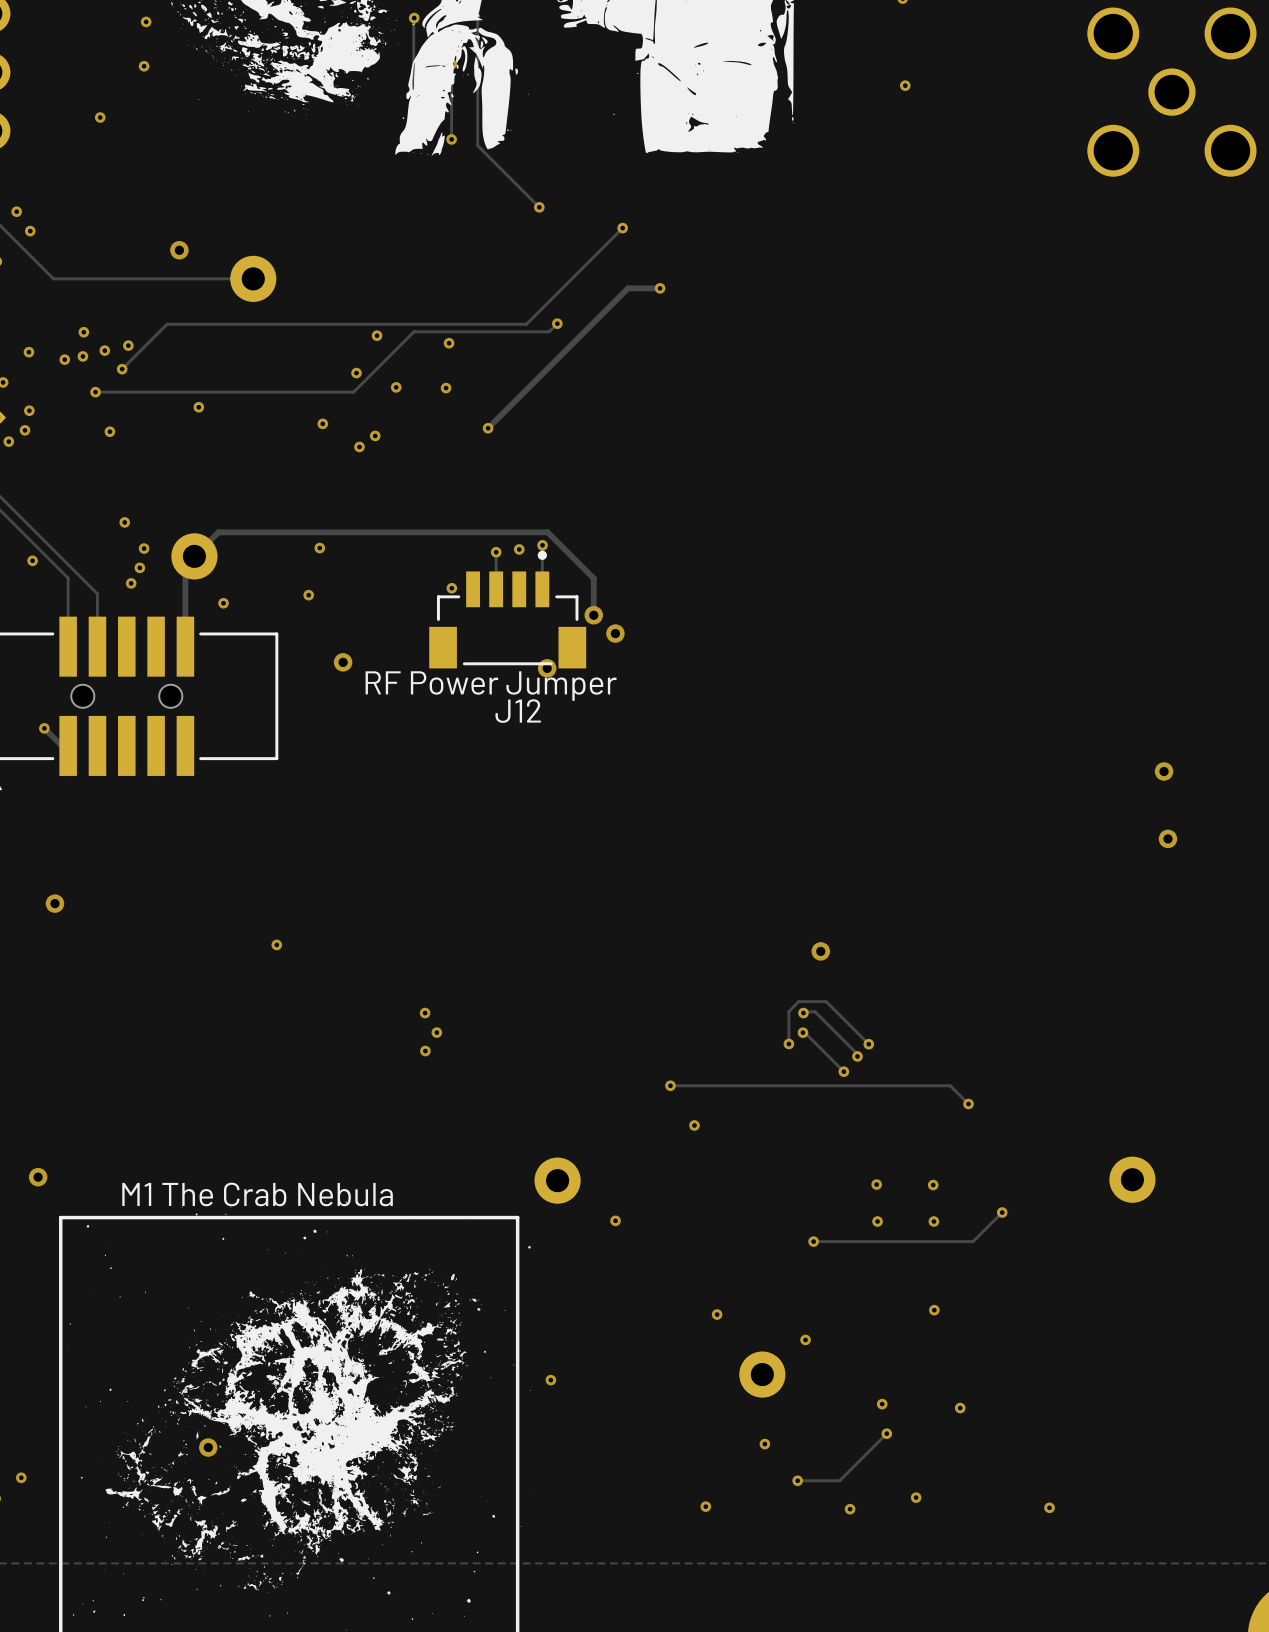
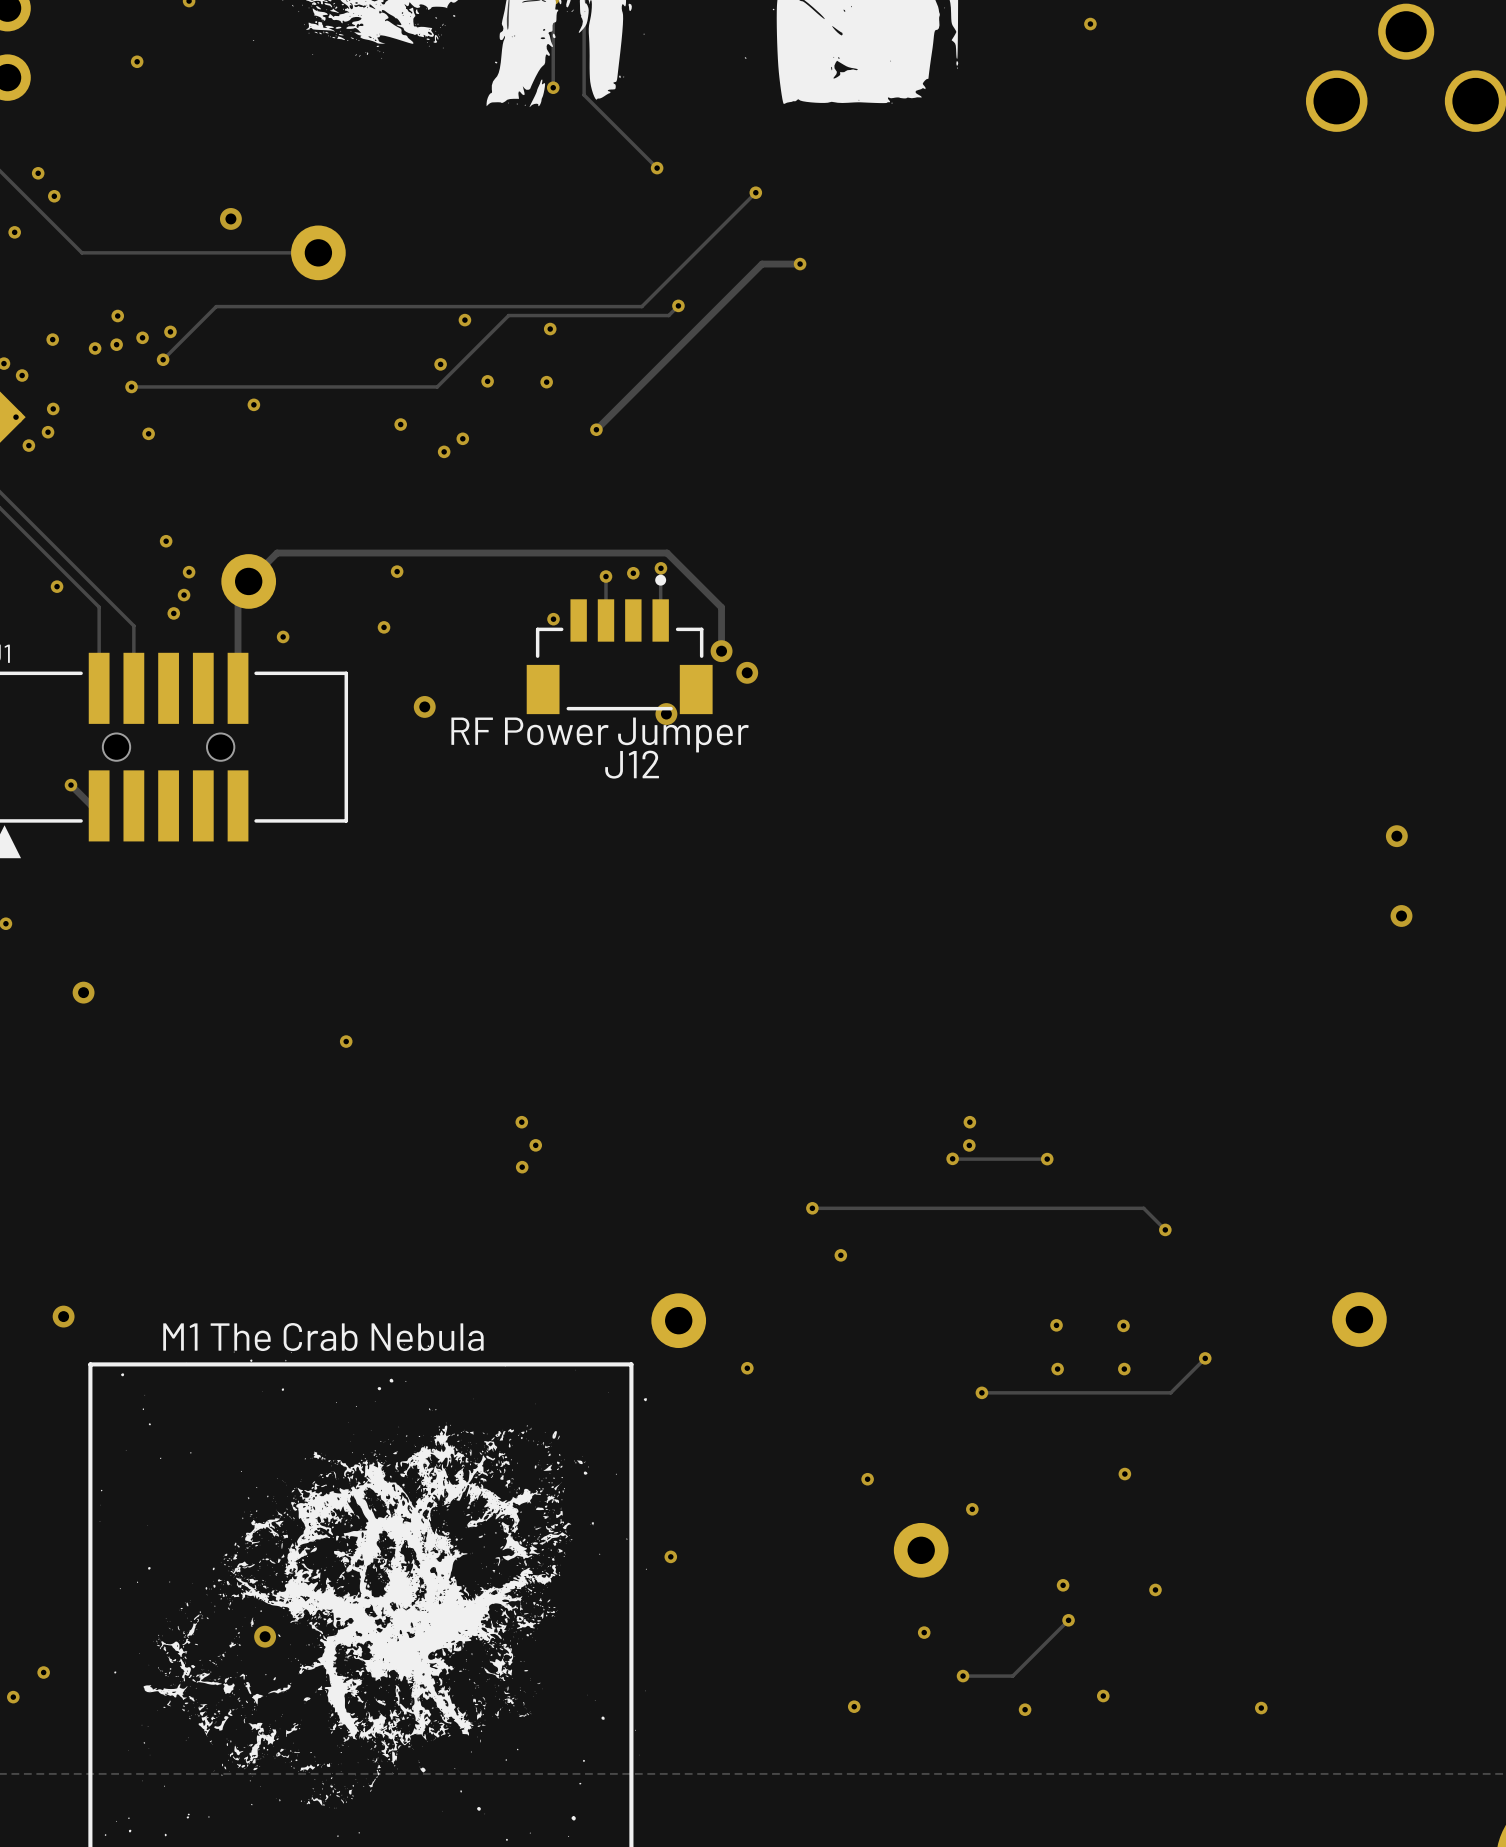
via: (820, 951) -> none
track: (803, 1011) (815, 1011) (857, 1054) (857, 1056) -> none
track: (804, 1032) (843, 1071) -> none
track: (788, 1043) (788, 1011) (798, 1001) (826, 1001) (868, 1044) -> (952, 1159) (1047, 1159)
via: (857, 1056) -> none
via: (843, 1071) -> none

